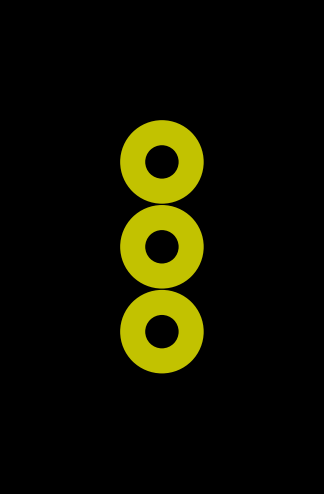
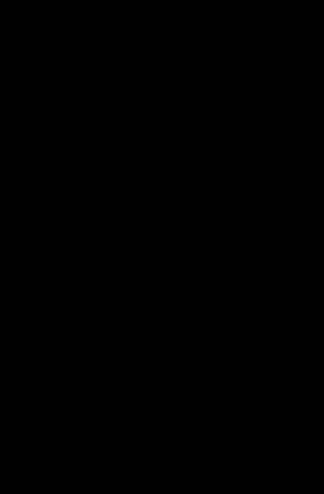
part: (161, 246) -> none

